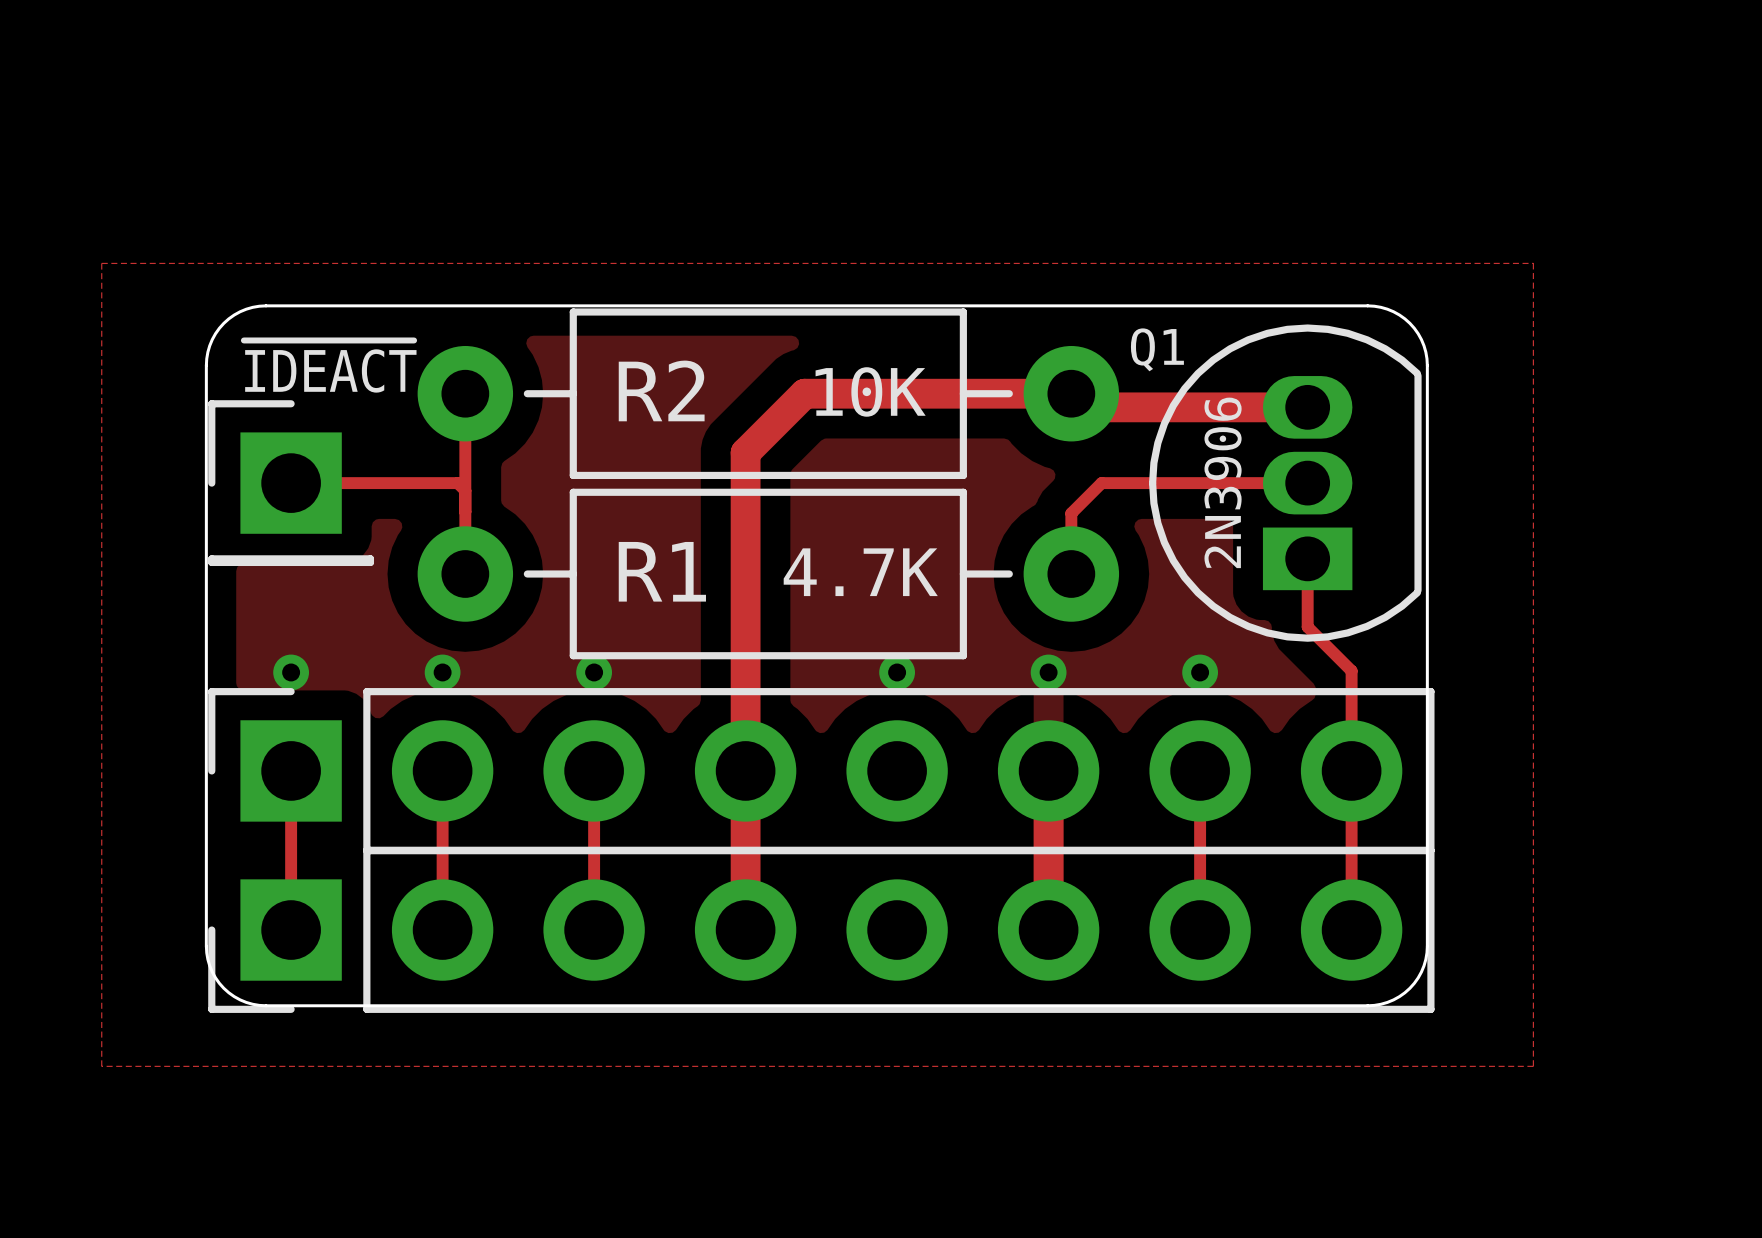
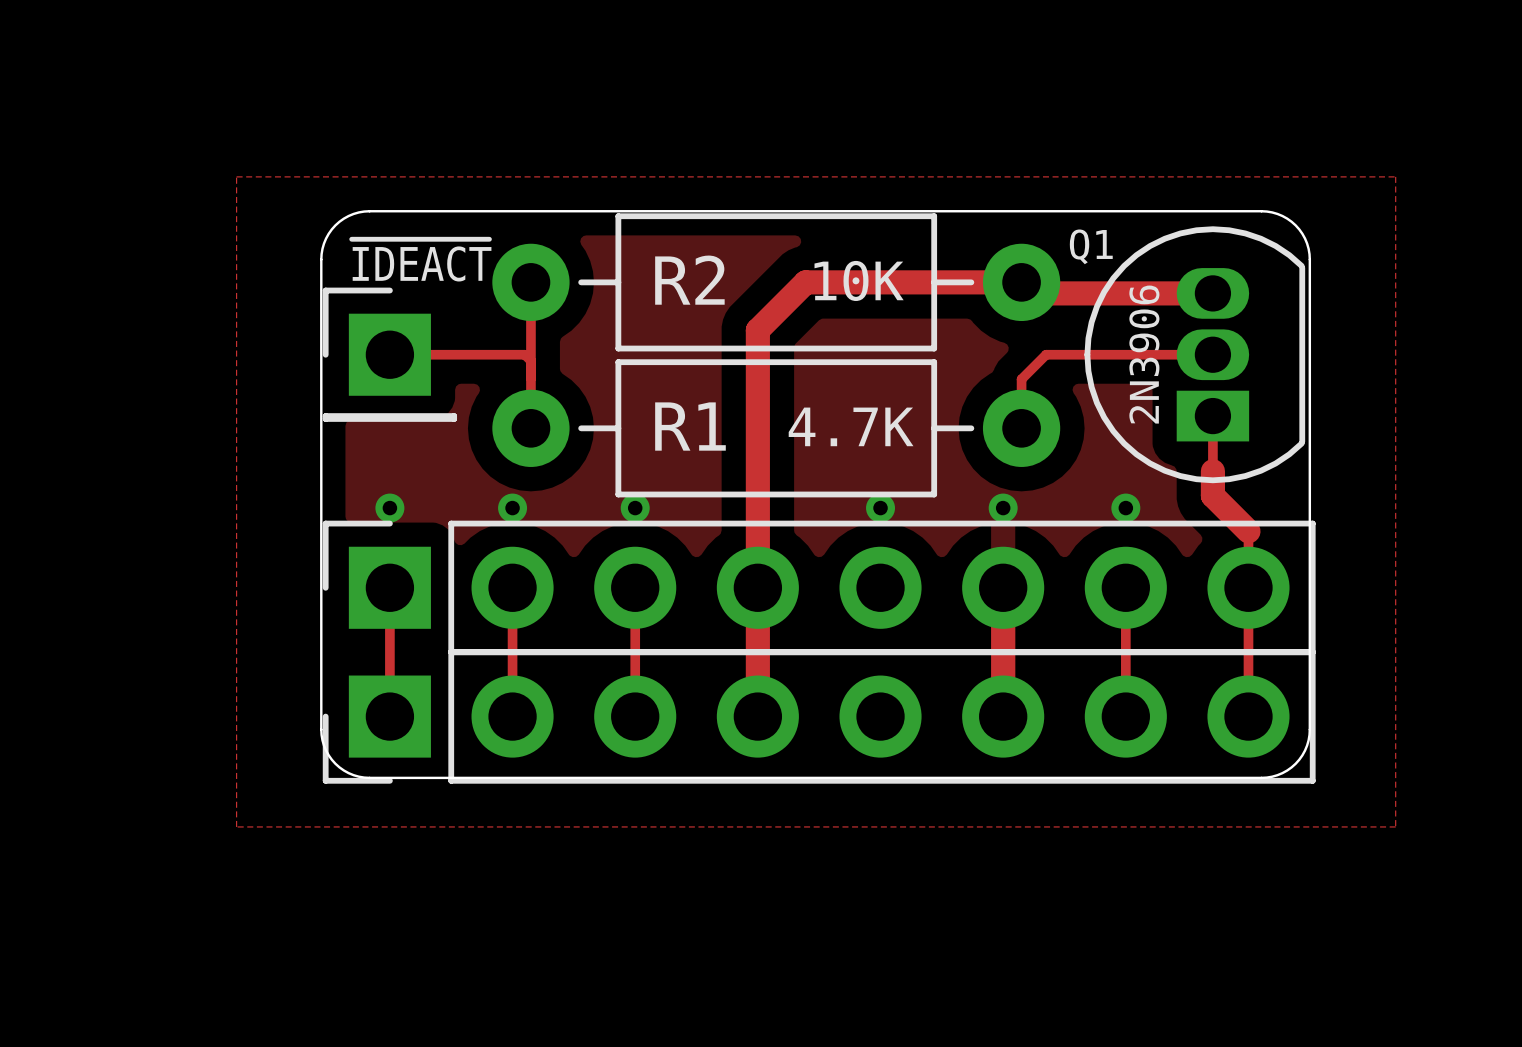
track: (1307, 627) (1351, 670) (1351, 701) -> (1212, 471) (1212, 495) (1248, 531)

